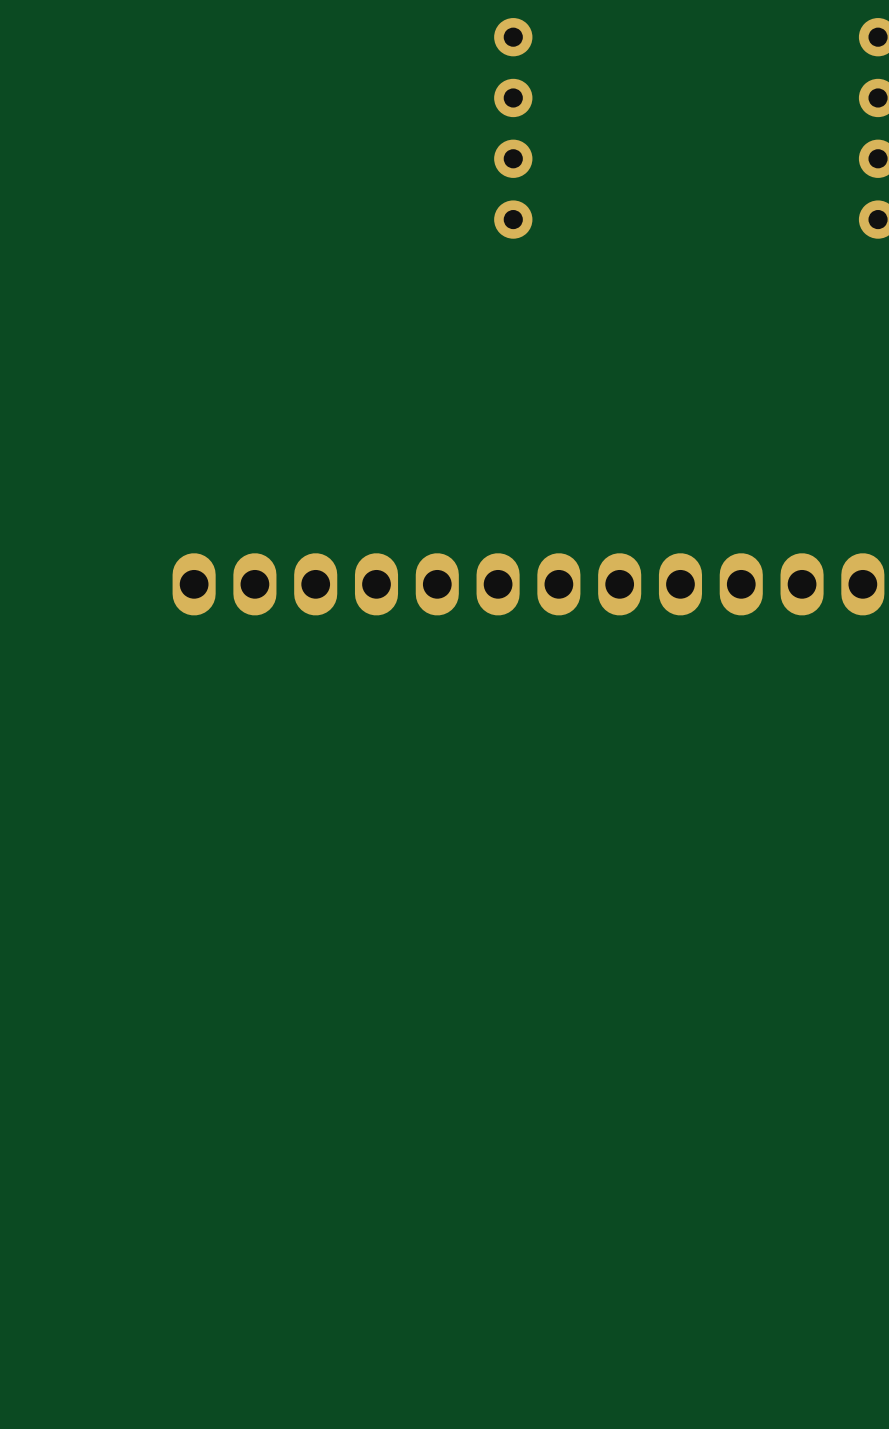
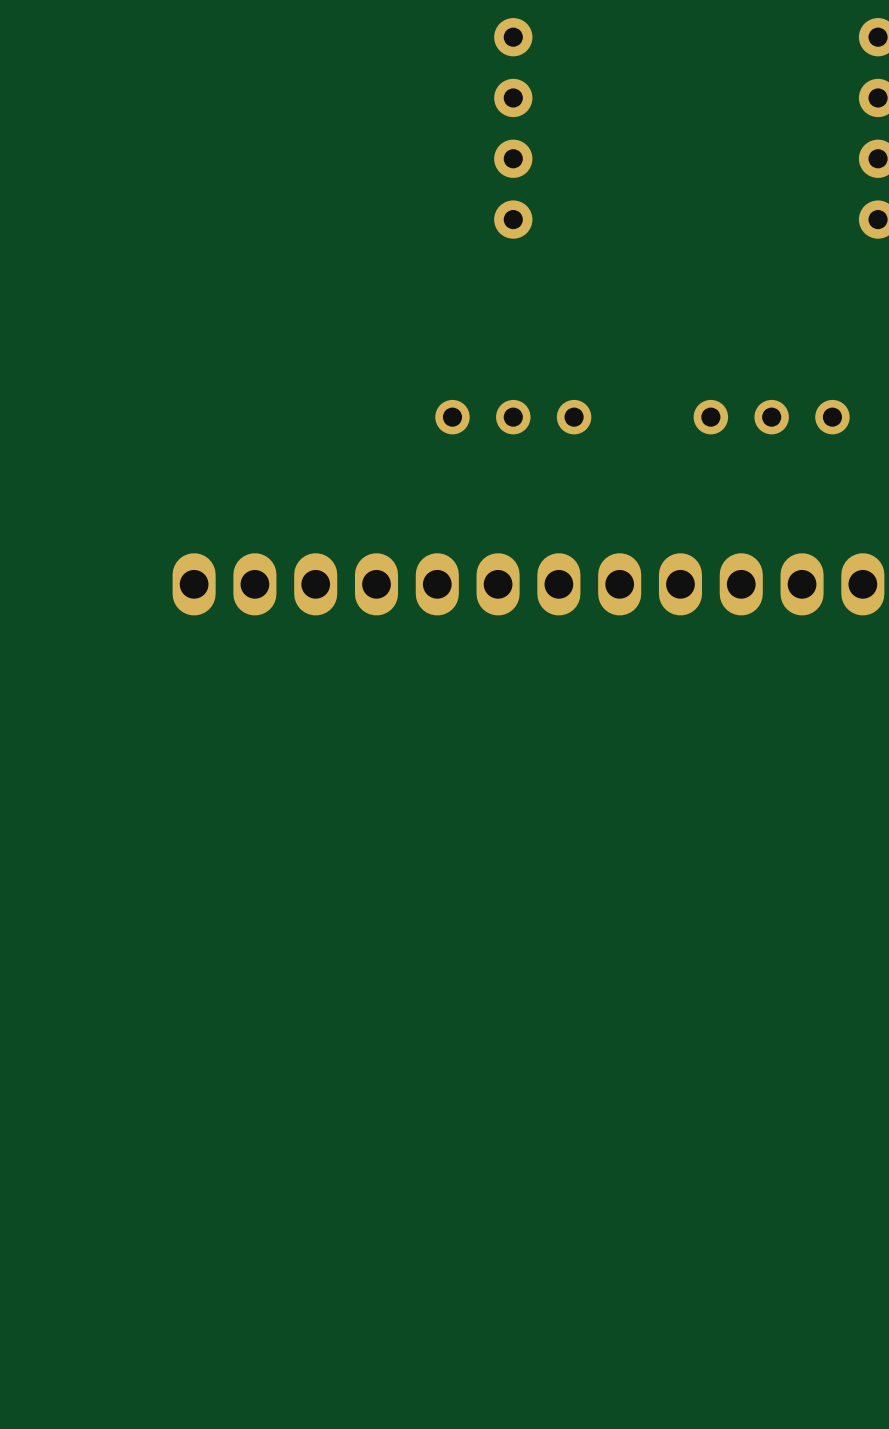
part: none -> (513, 417)
part: none -> (771, 417)

